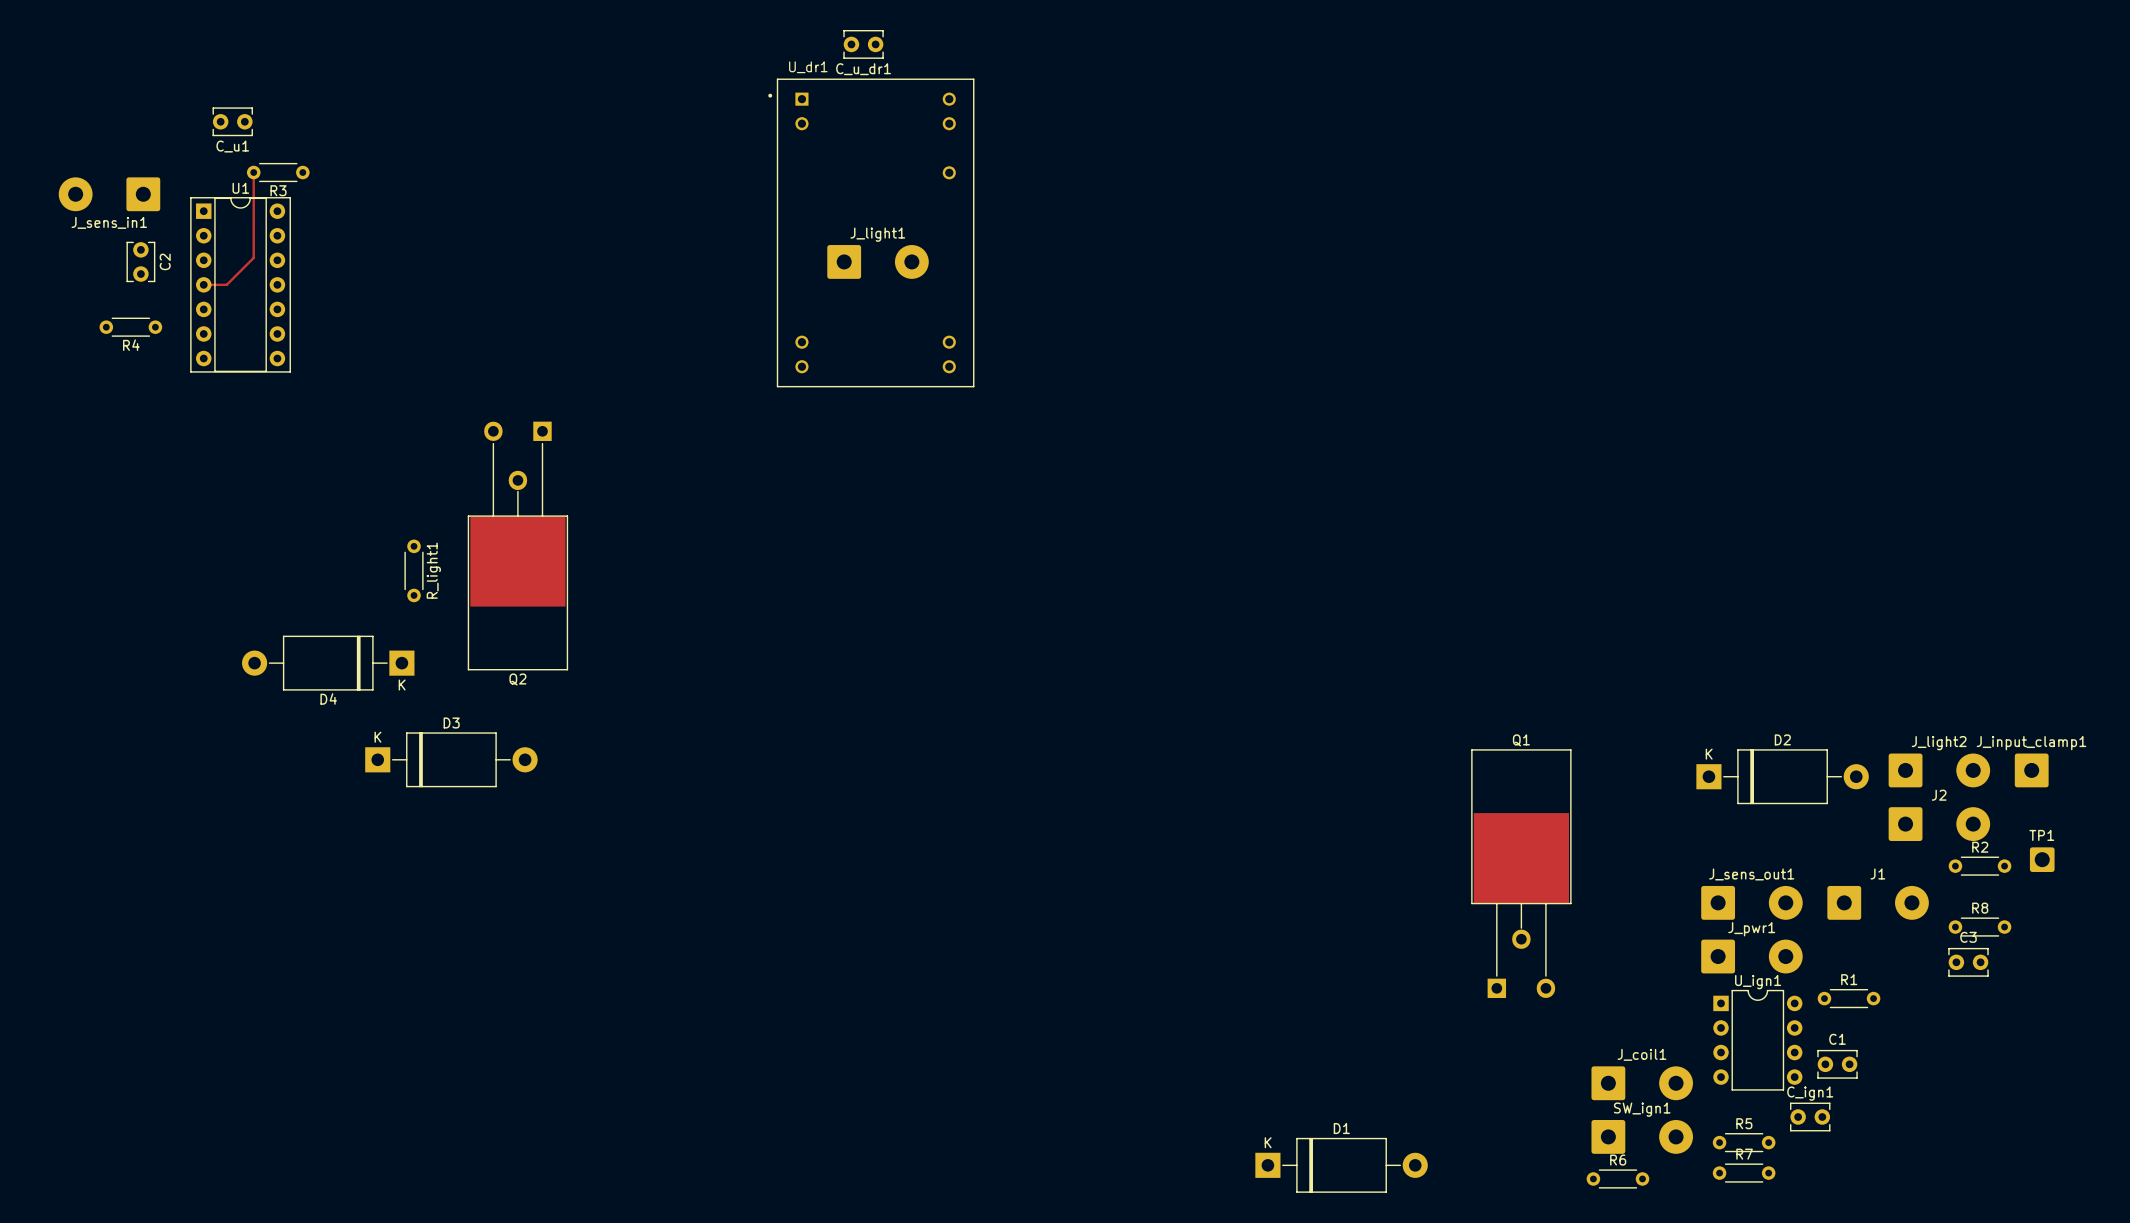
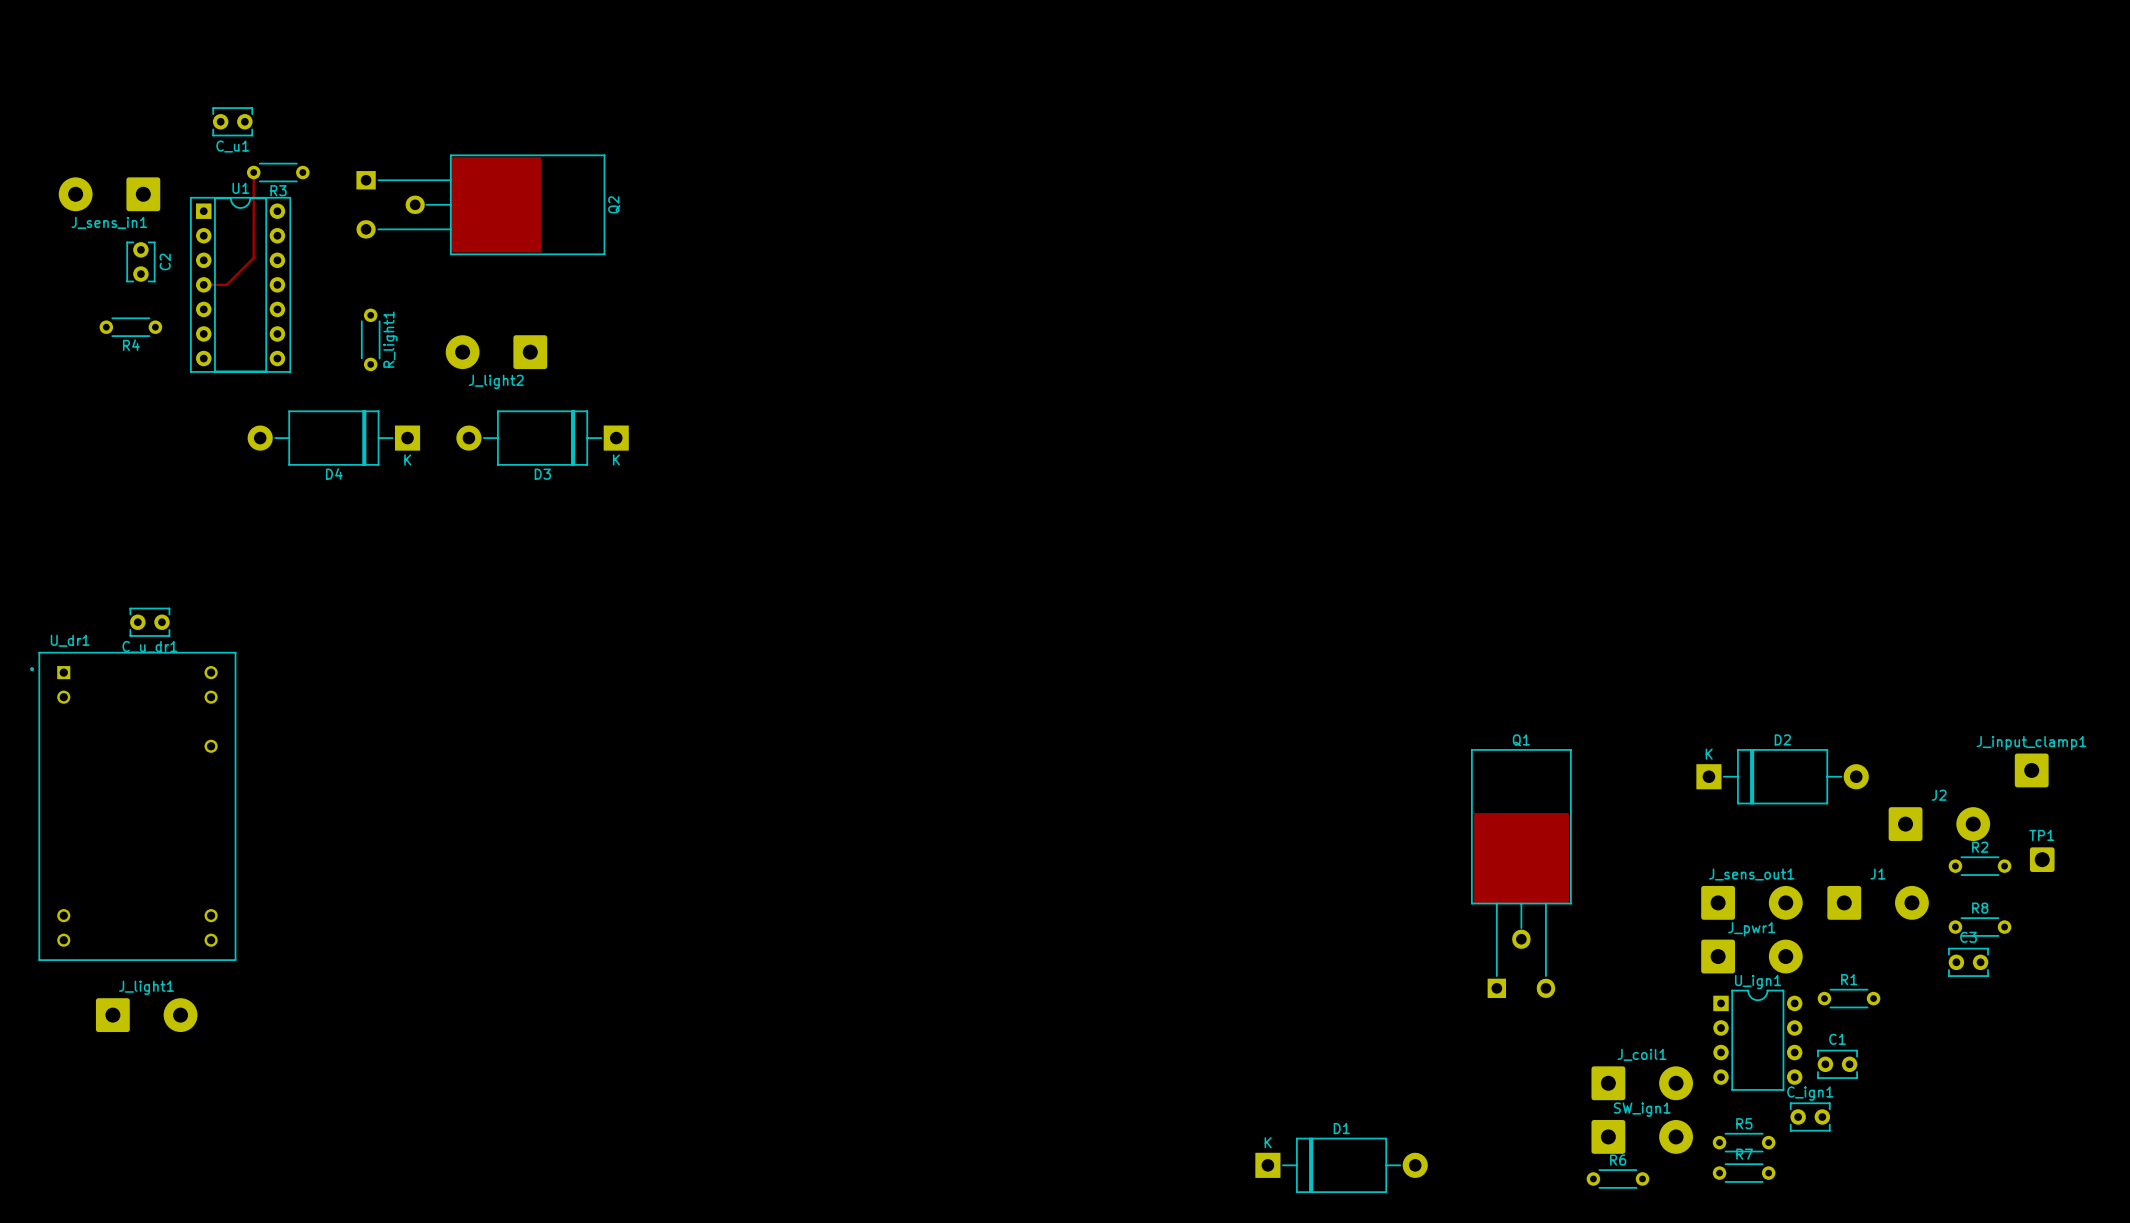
C_u_dr1 position: (863, 44) -> (149, 622)
U_dr1 position: (871, 232) -> (133, 806)
J_light1 position: (878, 261) -> (146, 1015)
Q2 rotation: 0° (517, 545) -> 90° counterclockwise (480, 204)
Q2 position: (517, 545) -> (480, 204)
R_light1 position: (414, 570) -> (370, 339)
D4 position: (328, 663) -> (333, 438)
D3 rotation: 0° (451, 759) -> 180° (542, 438)
D3 position: (451, 759) -> (542, 438)
J_light2 rotation: 0° (1939, 770) -> 180° (496, 352)
J_light2 position: (1939, 770) -> (496, 352)

